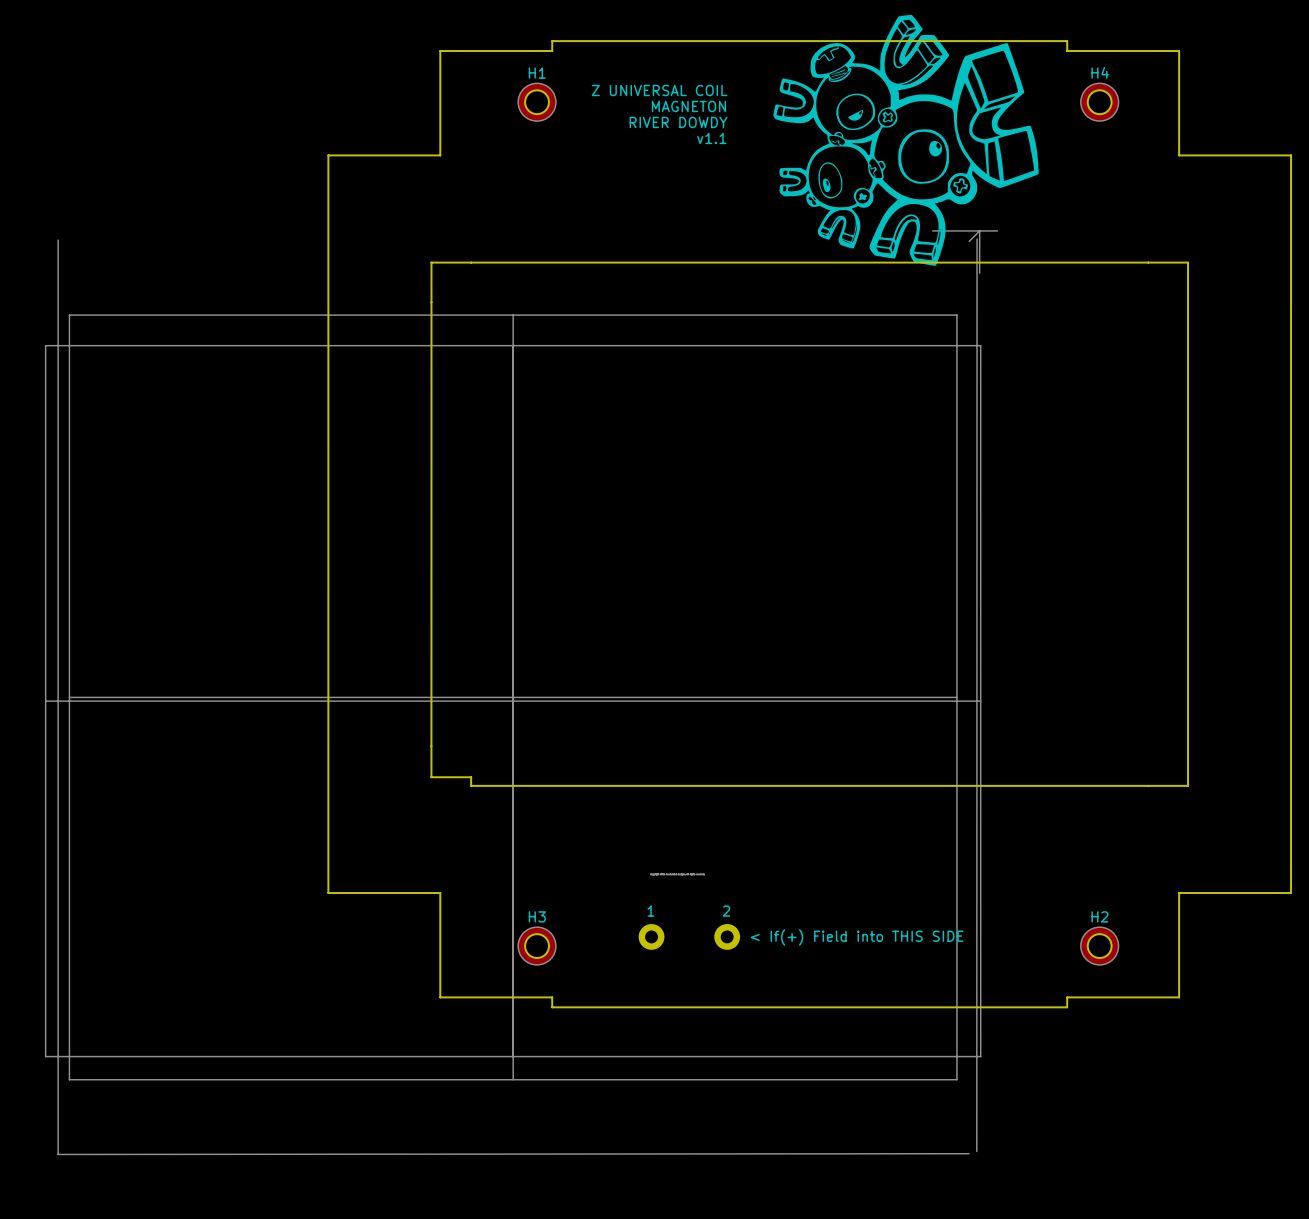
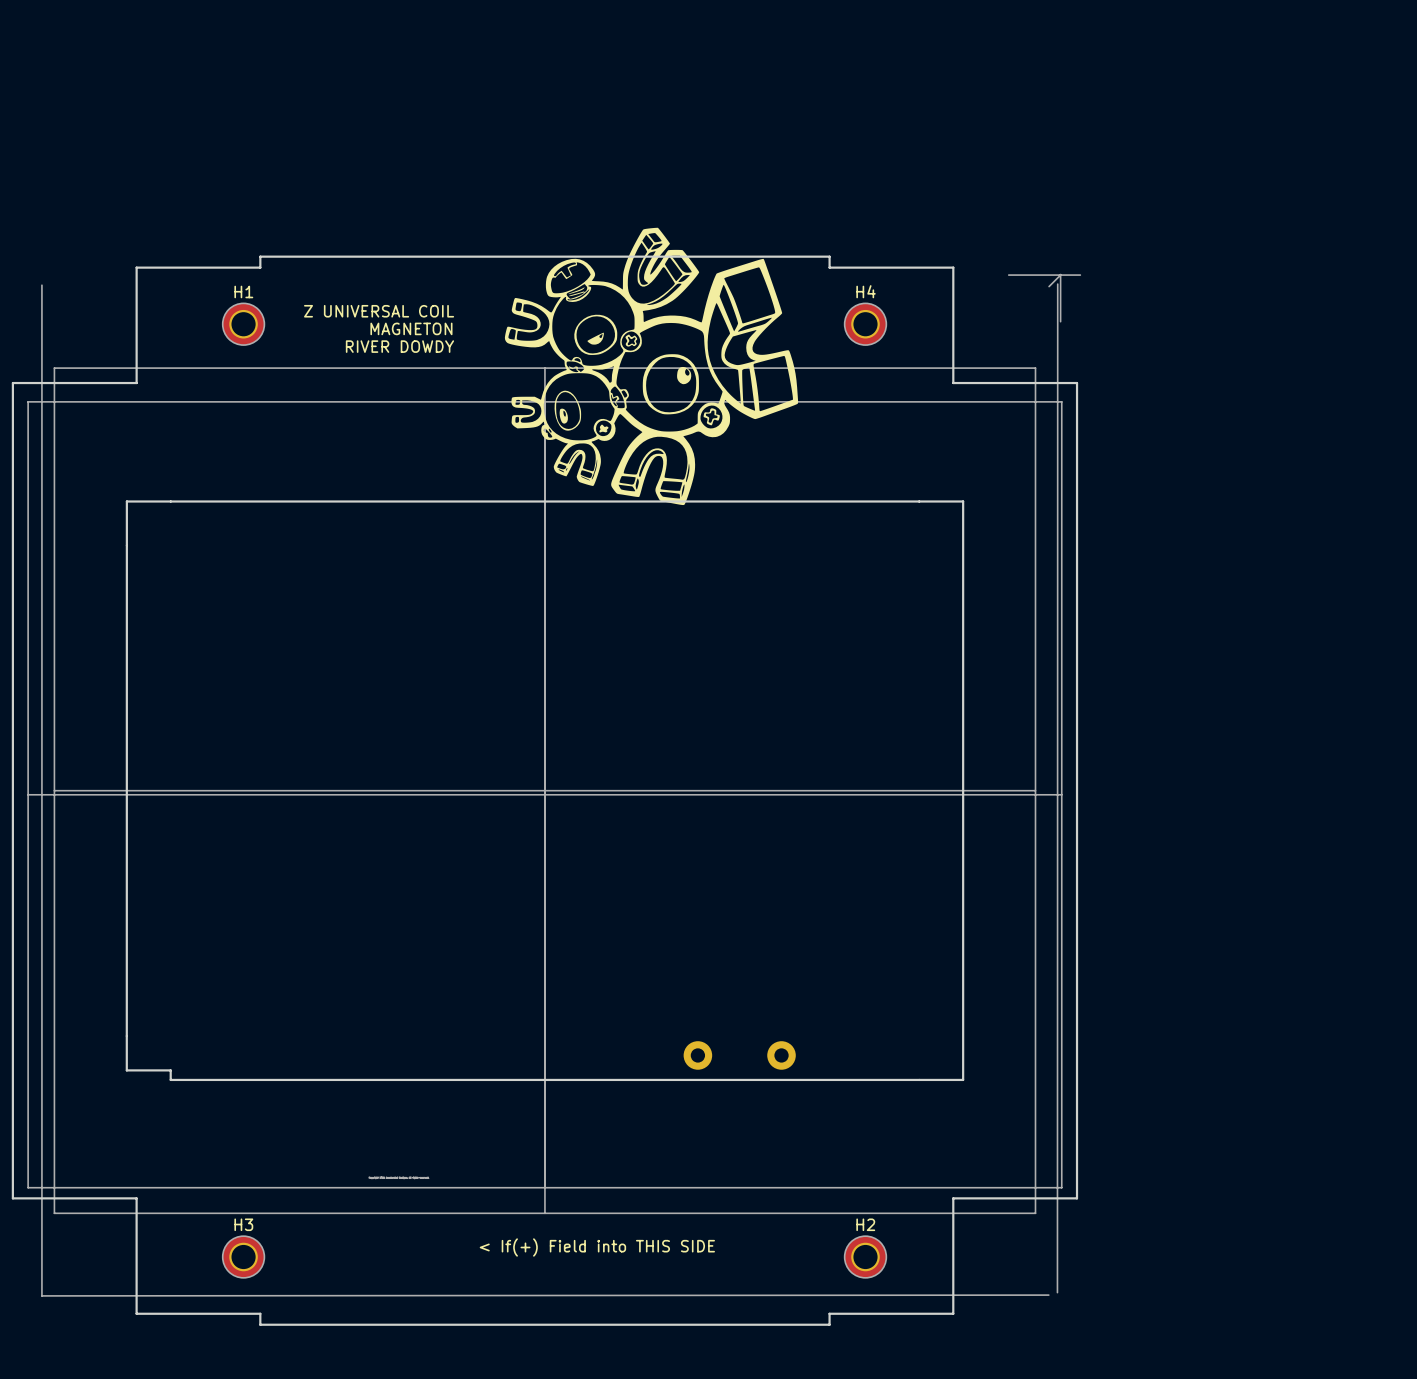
drawing: [773, 14, 1039, 266] -> none
board edge: (552, 41) (1067, 41) (1067, 51) (1179, 51) (1179, 155) (1291, 155) (1291, 893) (1179, 893) (1179, 997) (1067, 997) (1067, 1007) (552, 1007) (552, 997) (440, 997) (440, 893) (328, 893) (328, 155) (440, 155) (440, 51) (552, 51) (552, 41) -> none
text: Z UNIVERSAL COIL (659, 90) -> none
H1 position: (537, 102) -> (243, 324)
H4 position: (1099, 102) -> (865, 324)
text: MAGNETON (688, 106) -> none
text: RIVER DOWDY (678, 122) -> none
text: v1.1 (711, 138) -> none
drawing: none -> [504, 227, 799, 506]
board edge: none -> (260, 256) (829, 256) (829, 267) (953, 267) (953, 383) (1077, 383) (1077, 1198) (953, 1198) (953, 1313) (829, 1313) (829, 1324) (260, 1324) (260, 1313) (136, 1313) (136, 1198) (12, 1198) (12, 383) (136, 383) (136, 267) (260, 267) (260, 256)
board edge: (431, 262) (431, 777) (471, 777) (471, 785) (1188, 785) (1188, 262) (431, 262) -> none
text: none -> Z UNIVERSAL COIL (379, 311)
text: none -> MAGNETON (411, 328)
text: none -> RIVER DOWDY (399, 346)
board edge: none -> (126, 501) (126, 1070) (170, 1070) (170, 1079) (963, 1079) (963, 501) (126, 501)
part: (677, 874) -> none
text: 1 (651, 911) -> none
text: 2 (726, 911) -> none
text: < If(+) Field into THIS SIDE (857, 937) -> none
H3 position: (537, 946) -> (243, 1257)
H2 position: (1099, 946) -> (865, 1257)
part: none -> (398, 1177)
text: none -> < If(+) Field into THIS SIDE (597, 1247)

